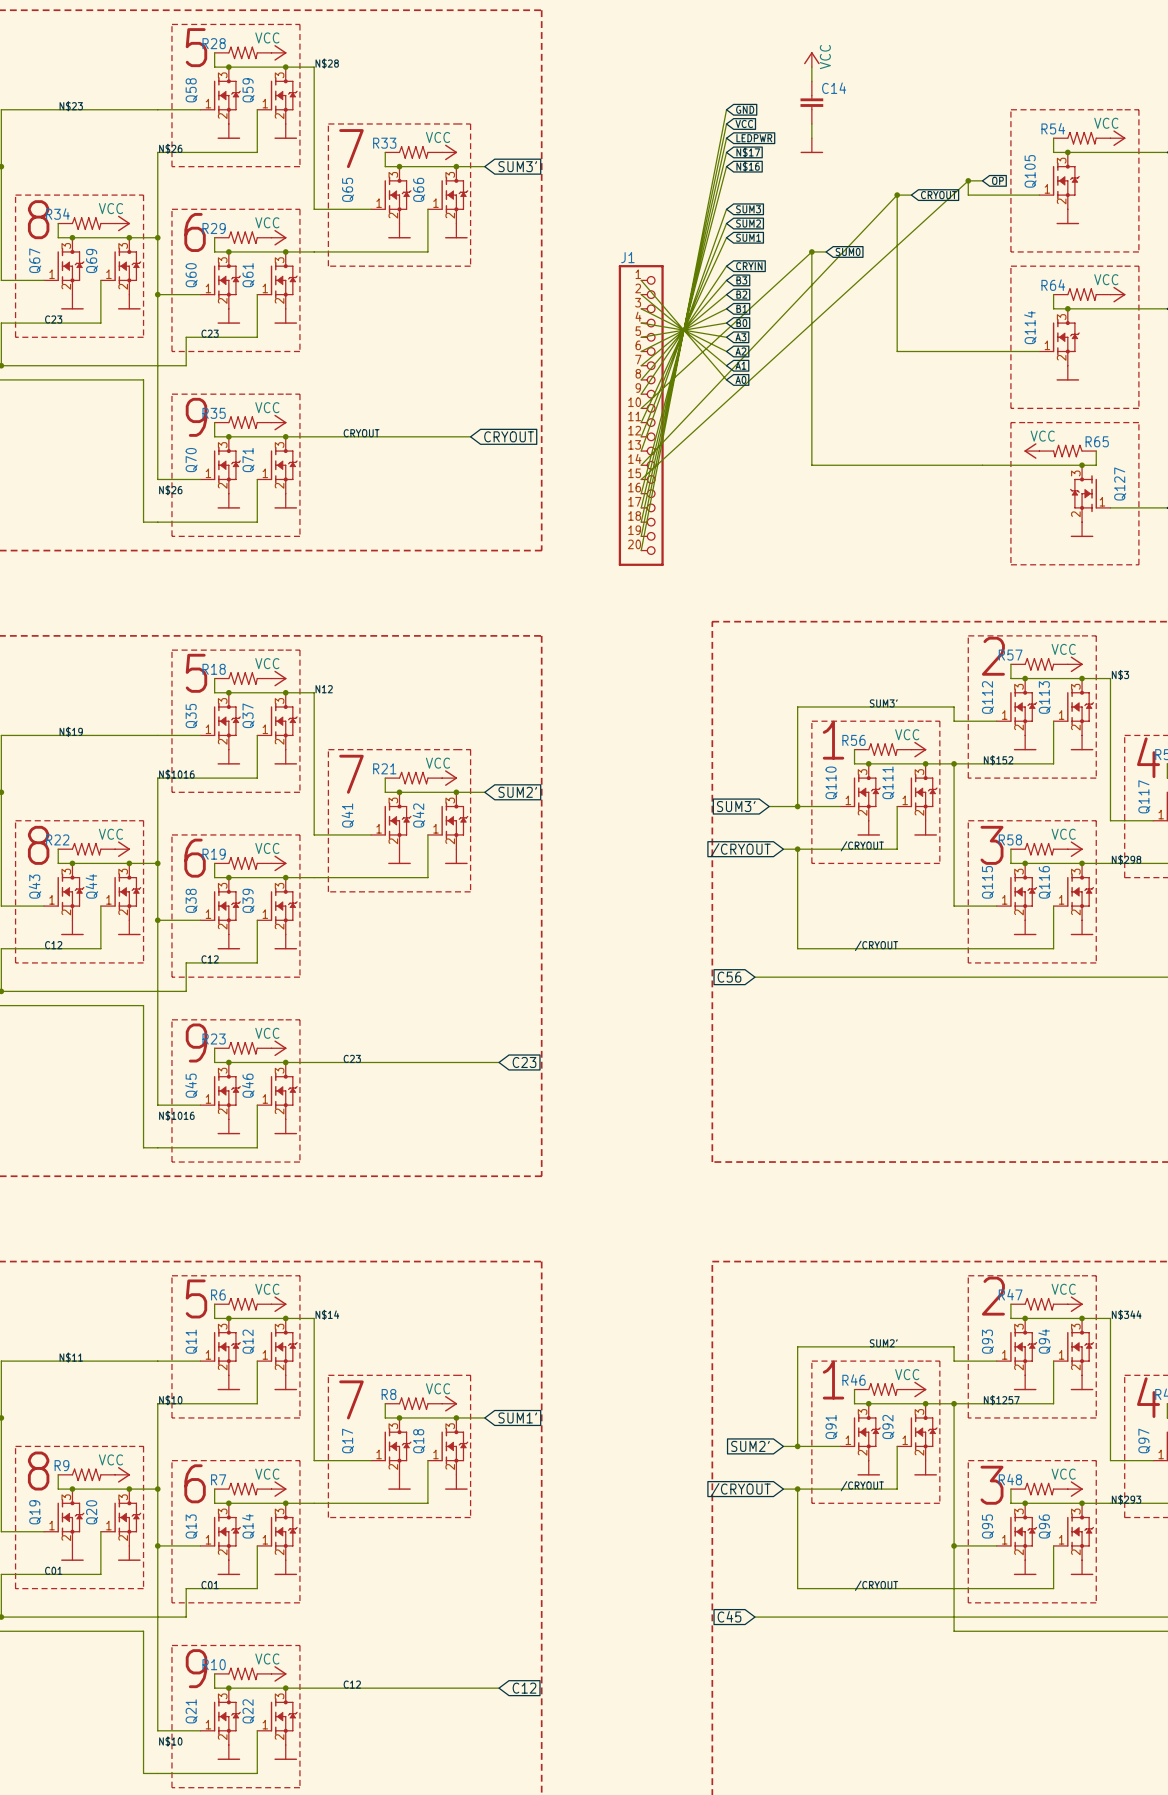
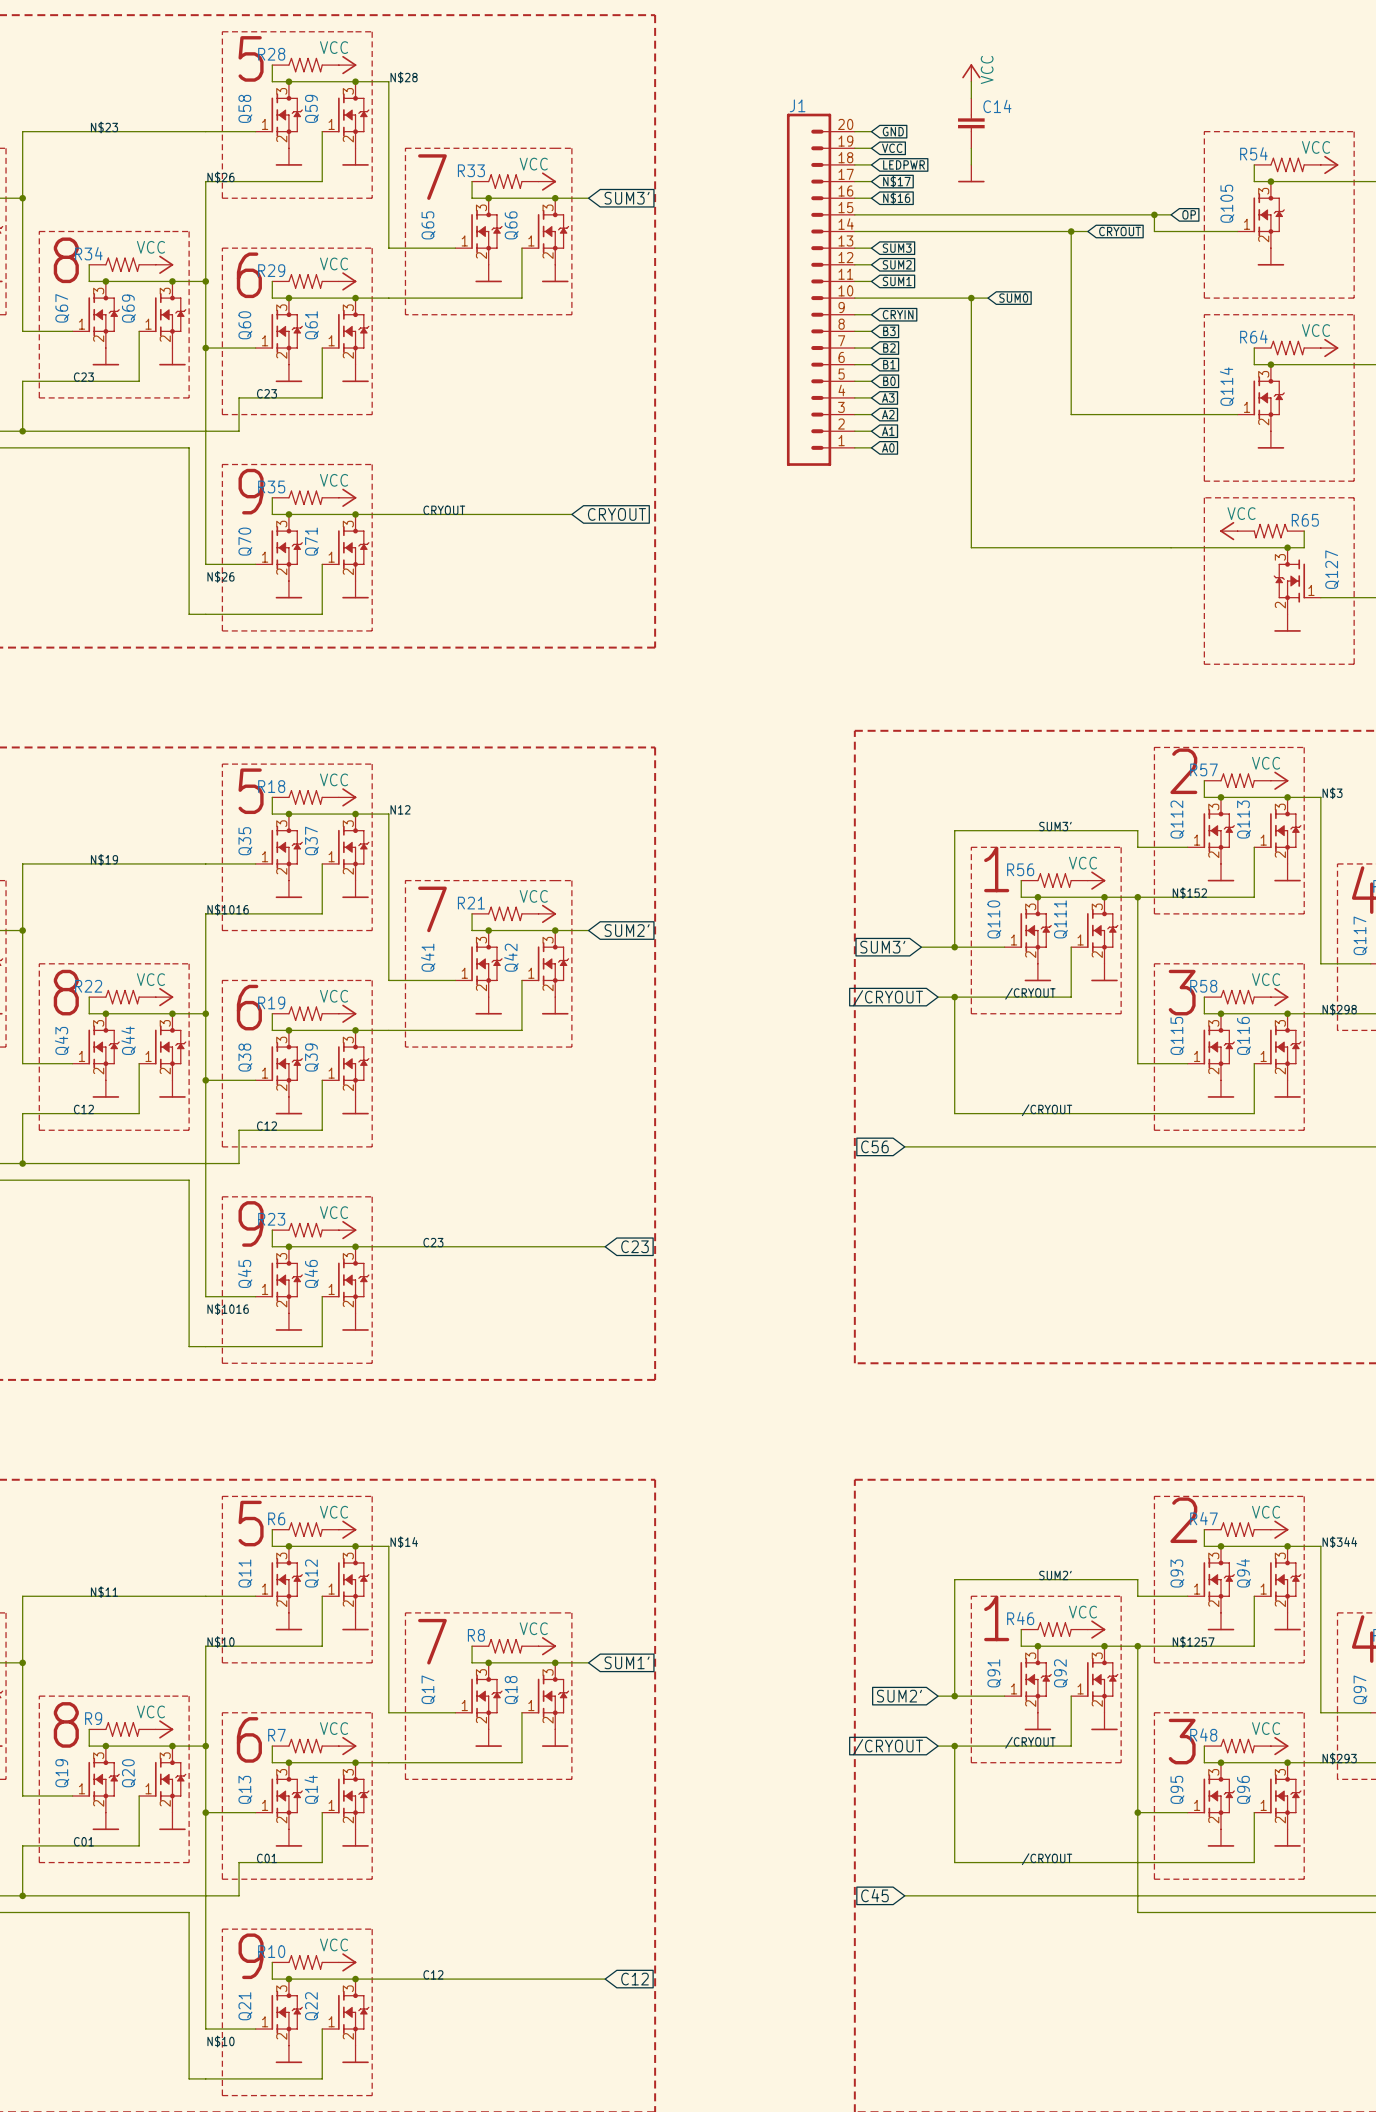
wire: (726, 109) (641, 550) -> (871, 131) (854, 131)
wire: (726, 123) (641, 536) -> (871, 148) (854, 148)
wire: (726, 138) (641, 522) -> (871, 164) (854, 164)
wire: (726, 152) (641, 507) -> (871, 181) (854, 181)
wire: (726, 166) (641, 493) -> (871, 198) (854, 198)
wire: (968, 180) (641, 479) -> (1154, 214) (854, 214)
wire: (897, 195) (641, 465) -> (1071, 231) (854, 231)
wire: (726, 209) (641, 451) -> (871, 248) (854, 248)
wire: (726, 223) (641, 436) -> (871, 264) (854, 264)
wire: (726, 237) (641, 422) -> (871, 281) (854, 281)
wire: (811, 251) (641, 408) -> (971, 298) (854, 298)
J1 symbol: [618, 265, 664, 566] -> [786, 113, 855, 466]
wire: (726, 266) (641, 394) -> (871, 314) (854, 314)
wire: (641, 280) (726, 379) -> (854, 447) (871, 447)
wire: (726, 280) (641, 379) -> (871, 331) (854, 331)
wire: (641, 294) (726, 365) -> (854, 431) (871, 431)
wire: (726, 294) (641, 365) -> (871, 348) (854, 348)
wire: (641, 308) (726, 351) -> (854, 414) (871, 414)
wire: (726, 308) (641, 351) -> (871, 364) (854, 364)
wire: (641, 323) (726, 337) -> (854, 397) (871, 397)
wire: (726, 323) (641, 337) -> (871, 381) (854, 381)

